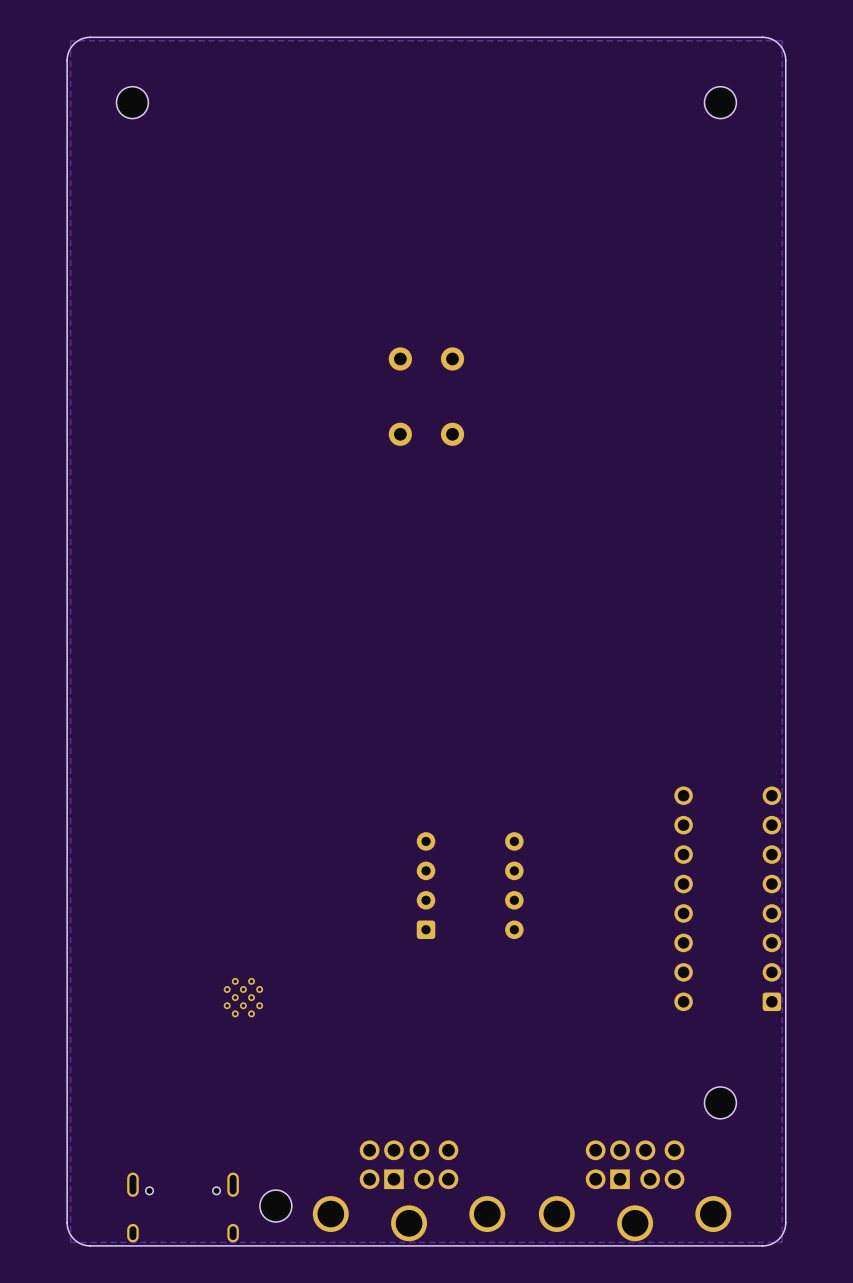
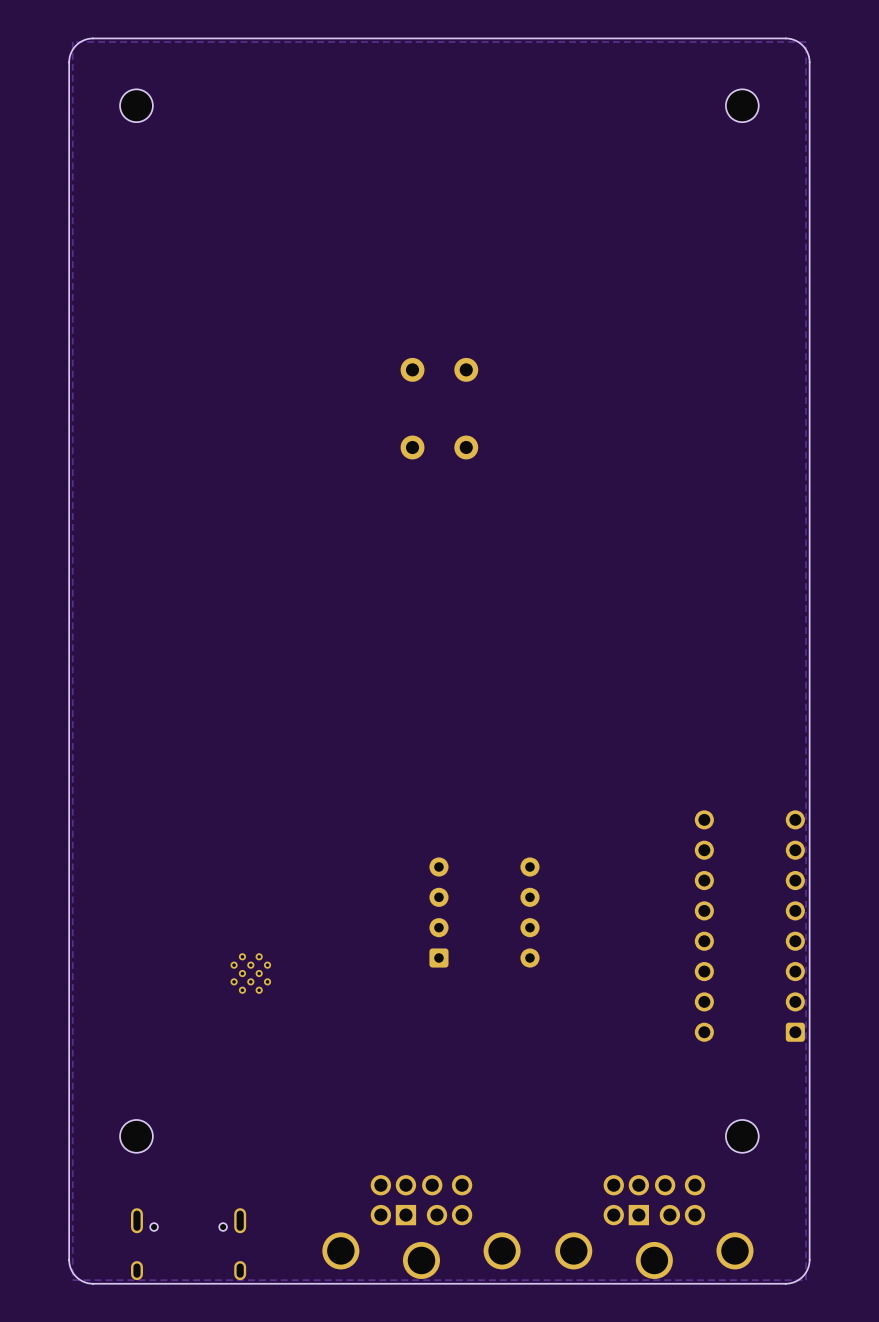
part position: (243, 997) -> (250, 973)
part position: (275, 1206) -> (136, 1136)

